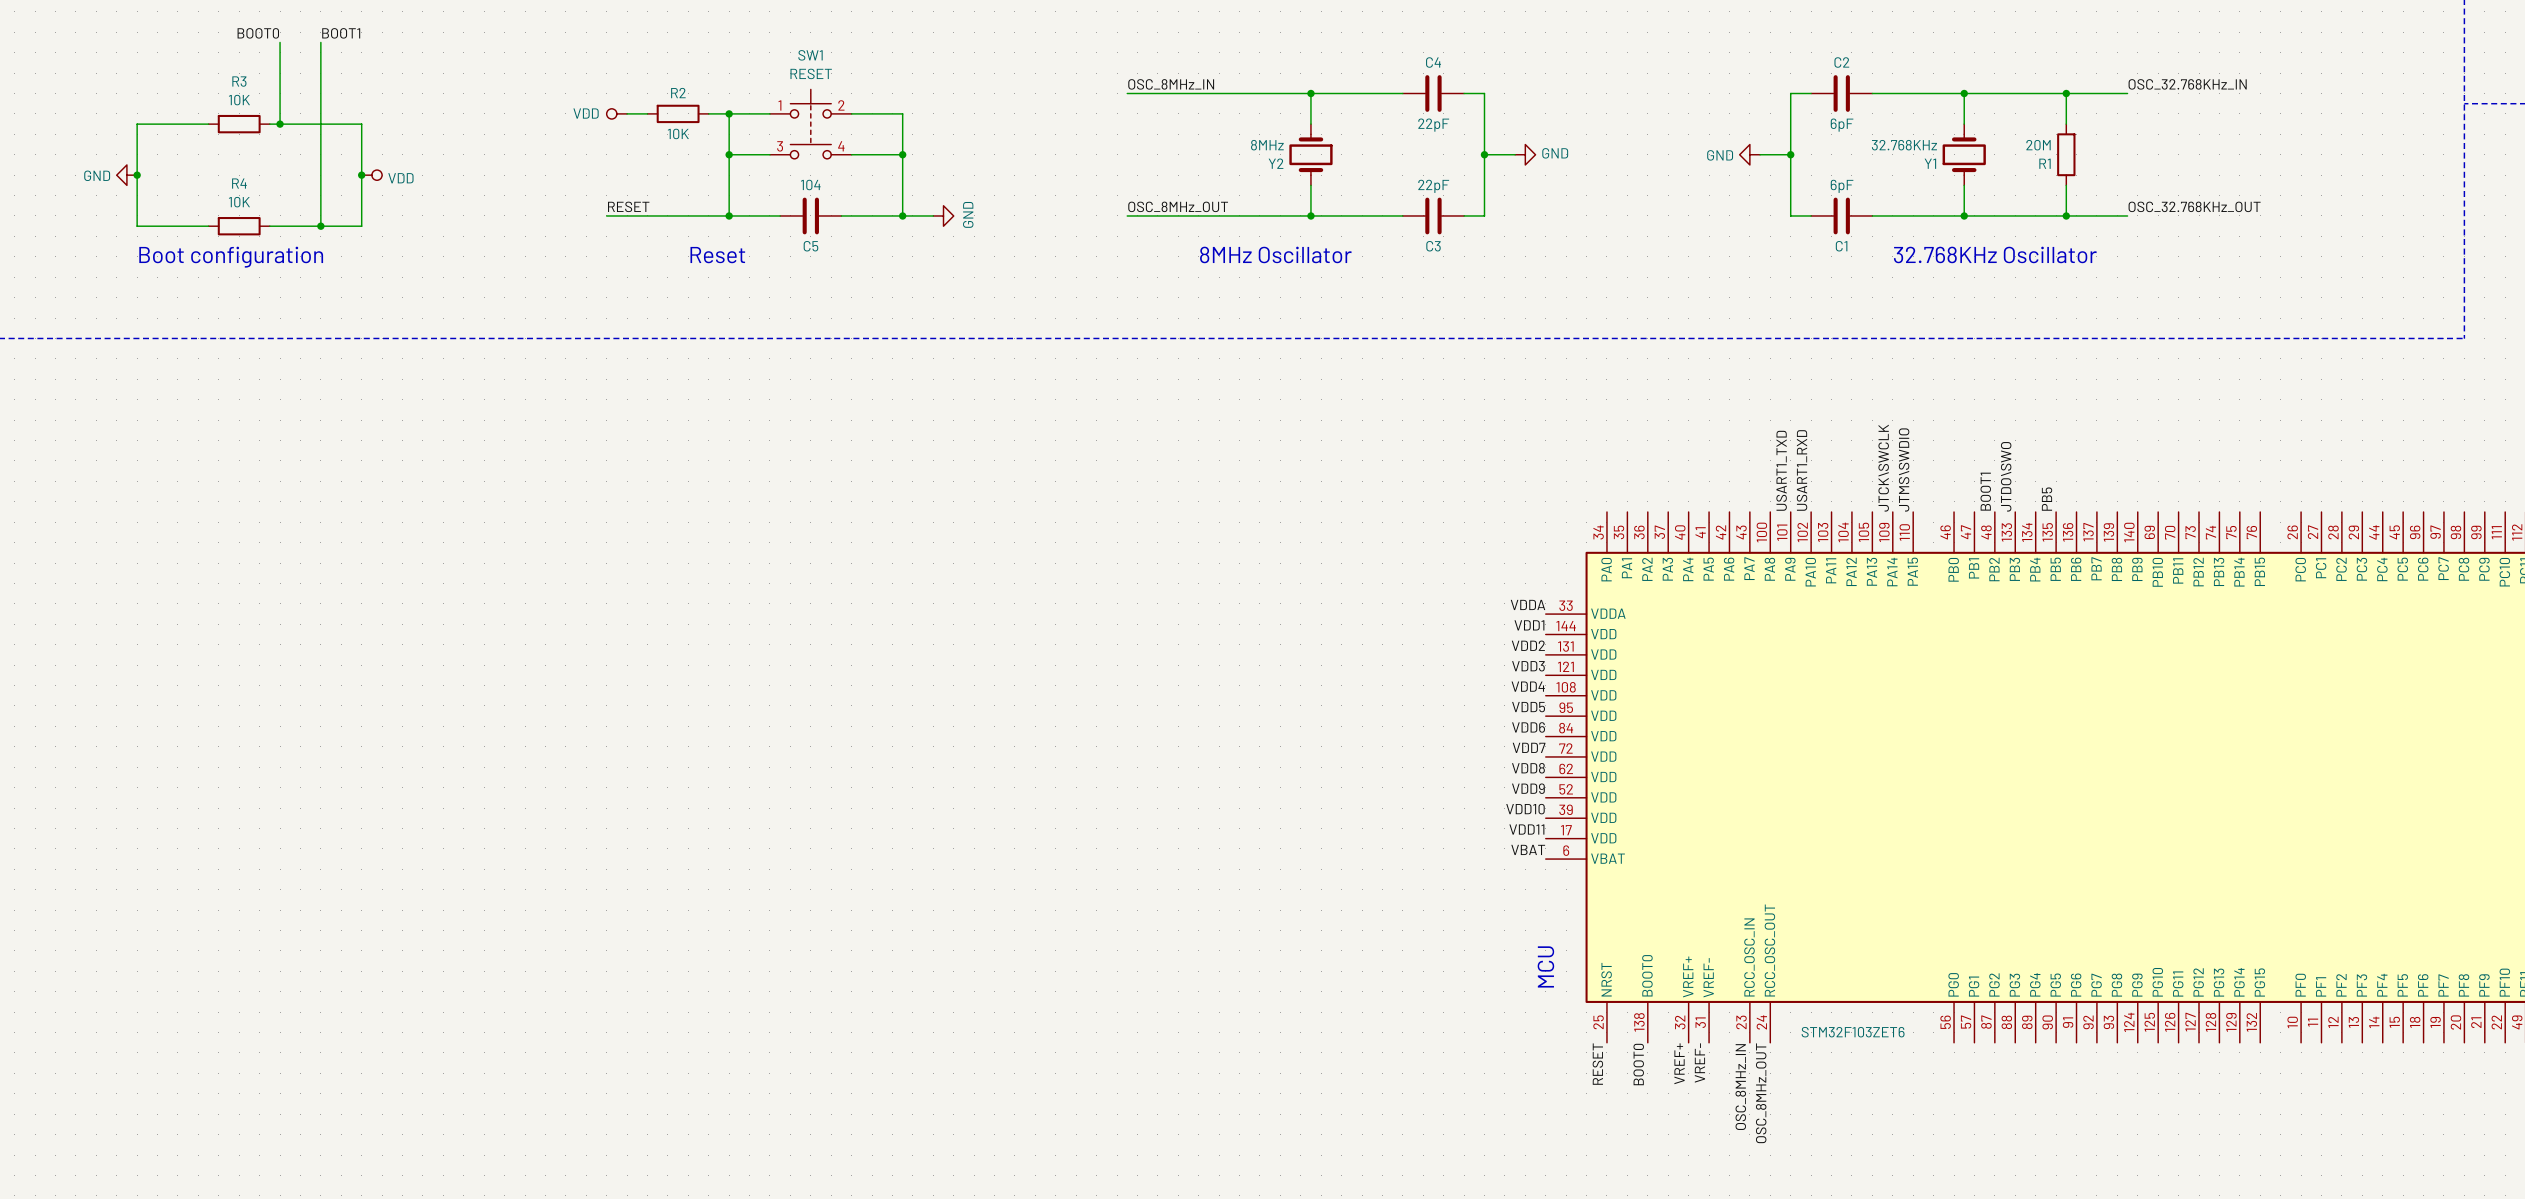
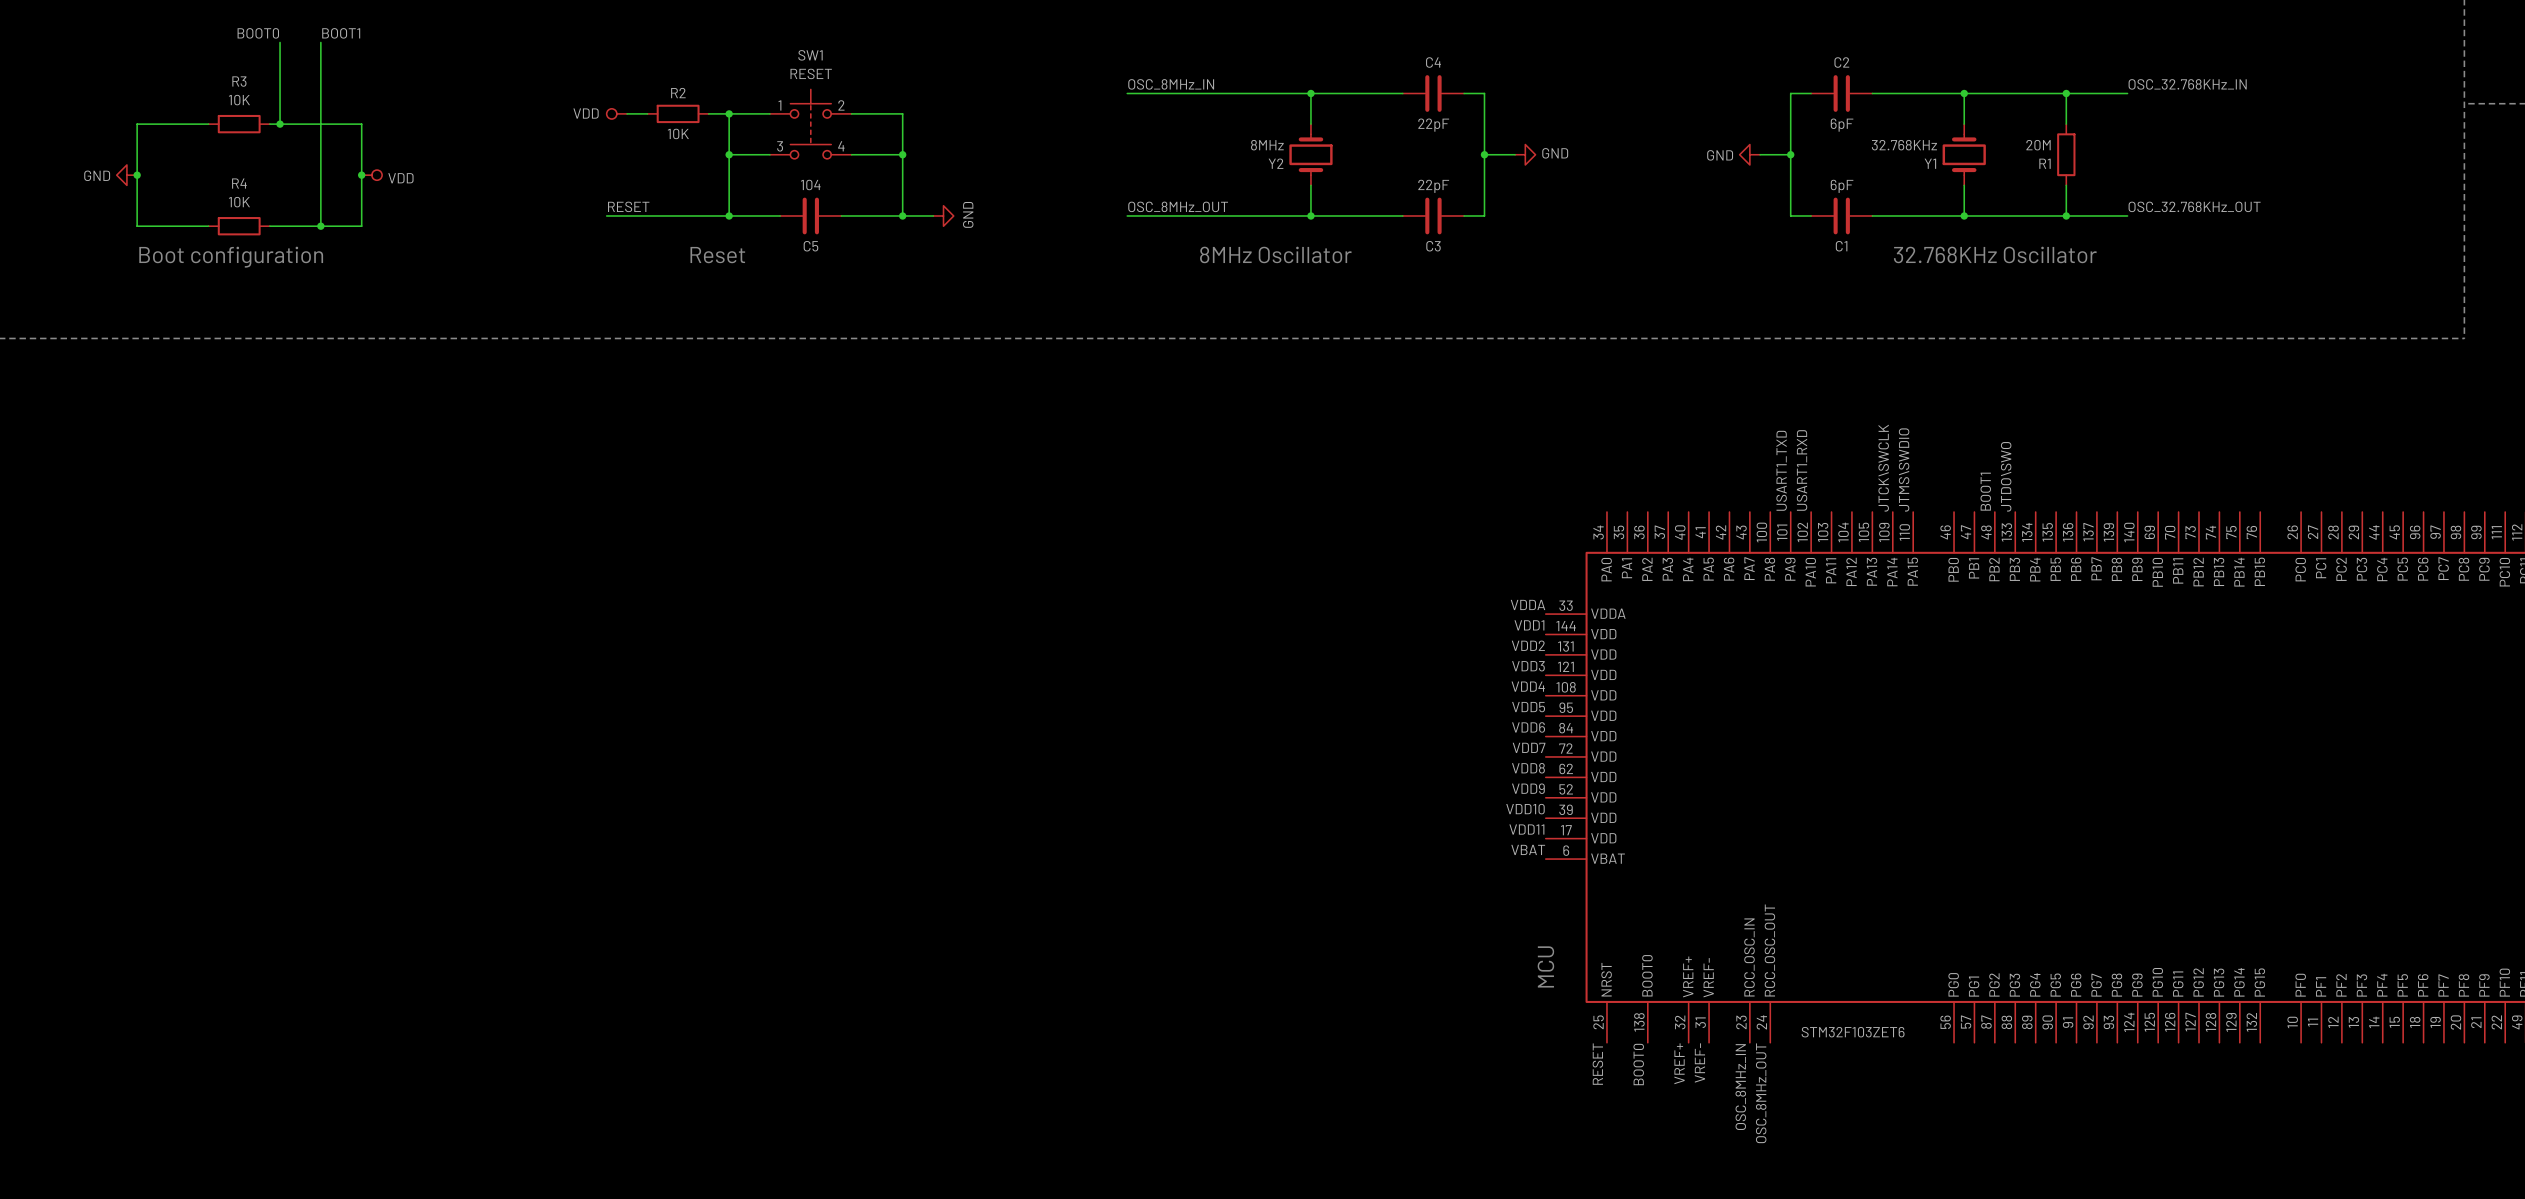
label: PB5 (2047, 499) -> none

